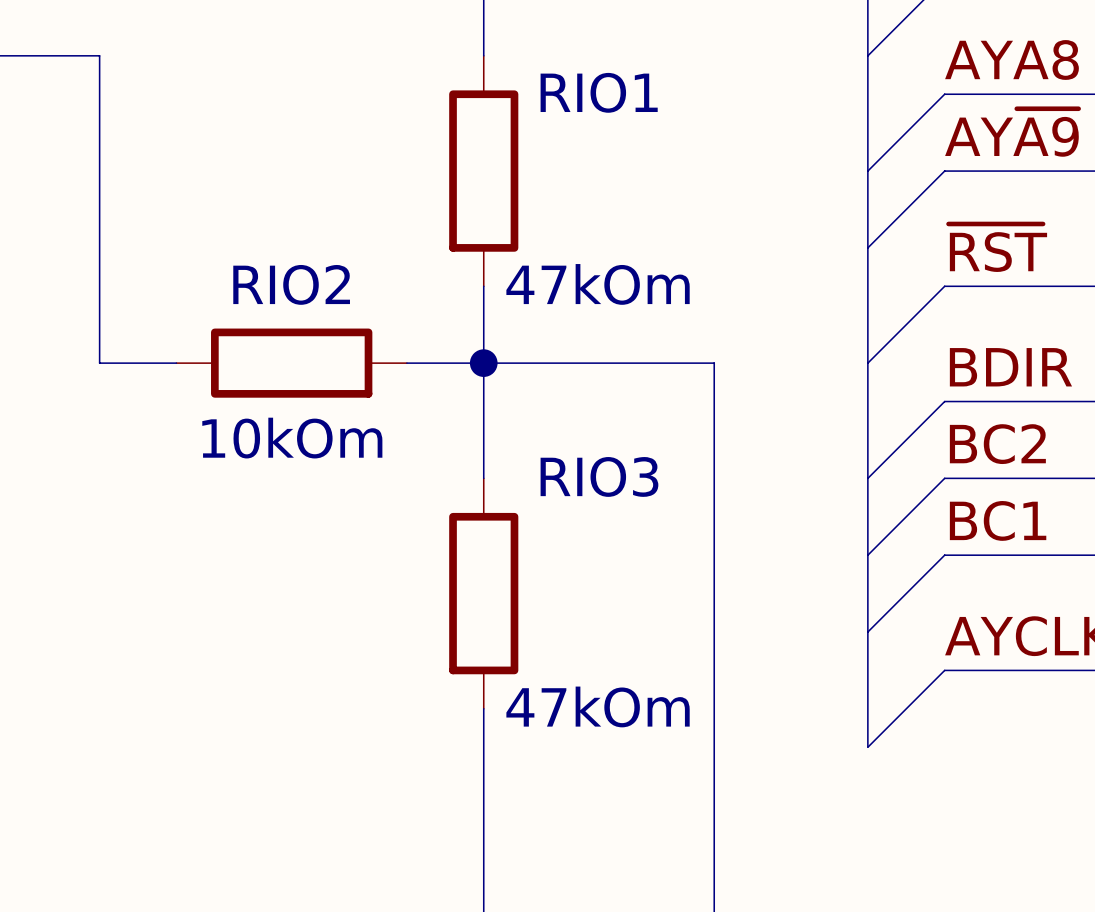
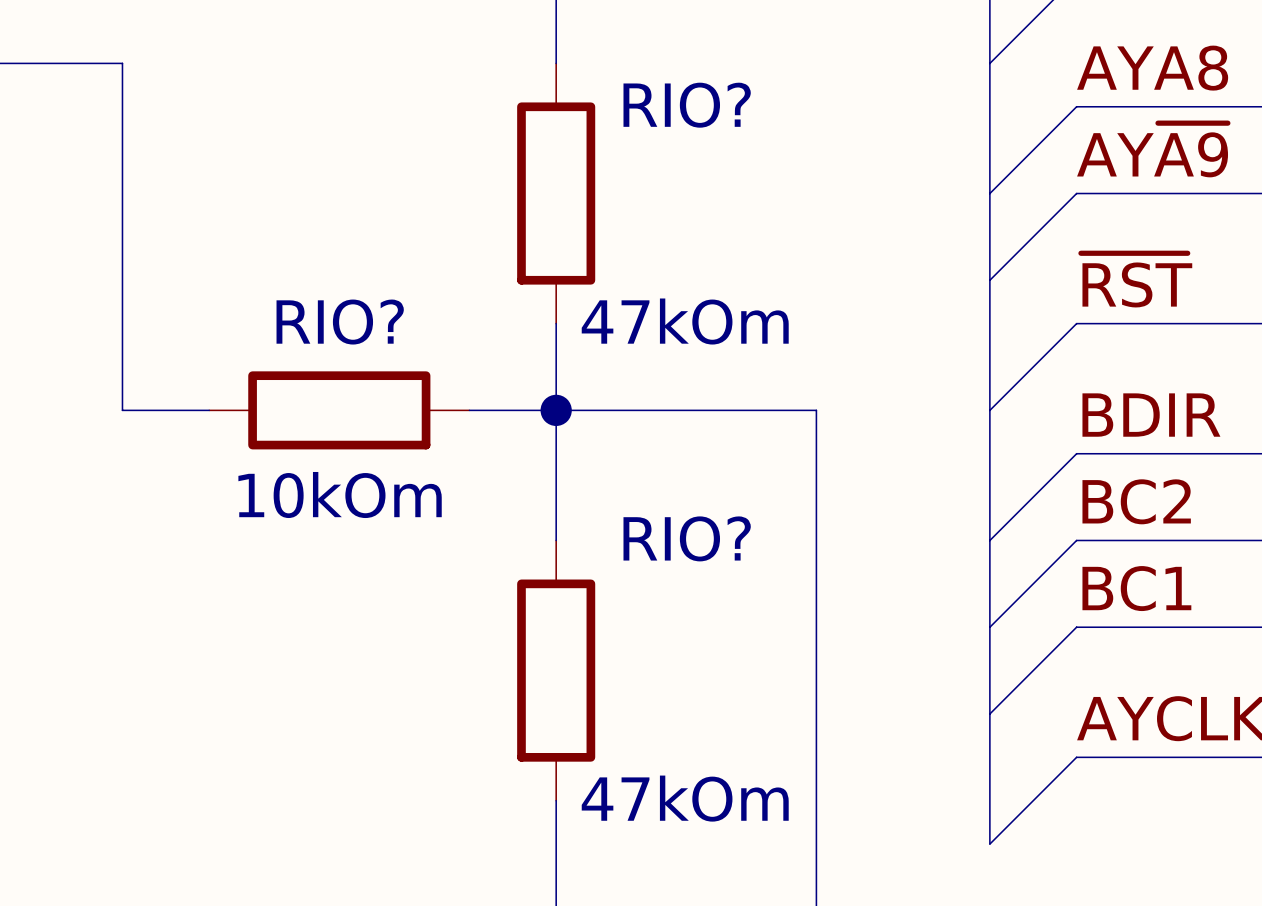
RIO1 name: RIO1 (599, 92) -> RIO? (687, 105)
RIO2 name: RIO2 (291, 284) -> RIO? (340, 322)
RIO3 name: RIO3 (599, 476) -> RIO? (687, 538)

